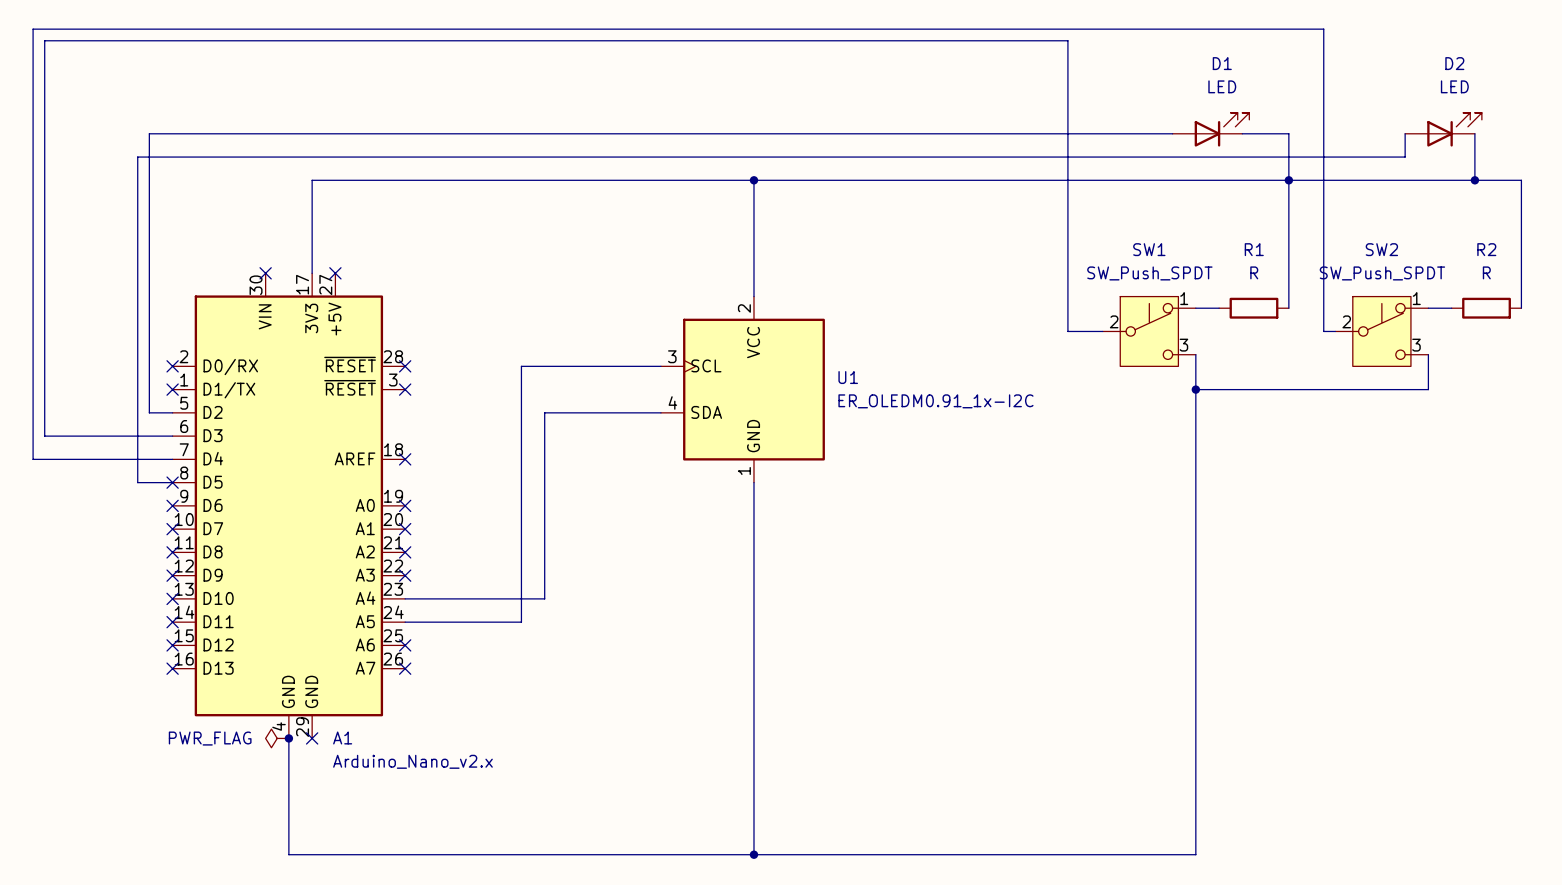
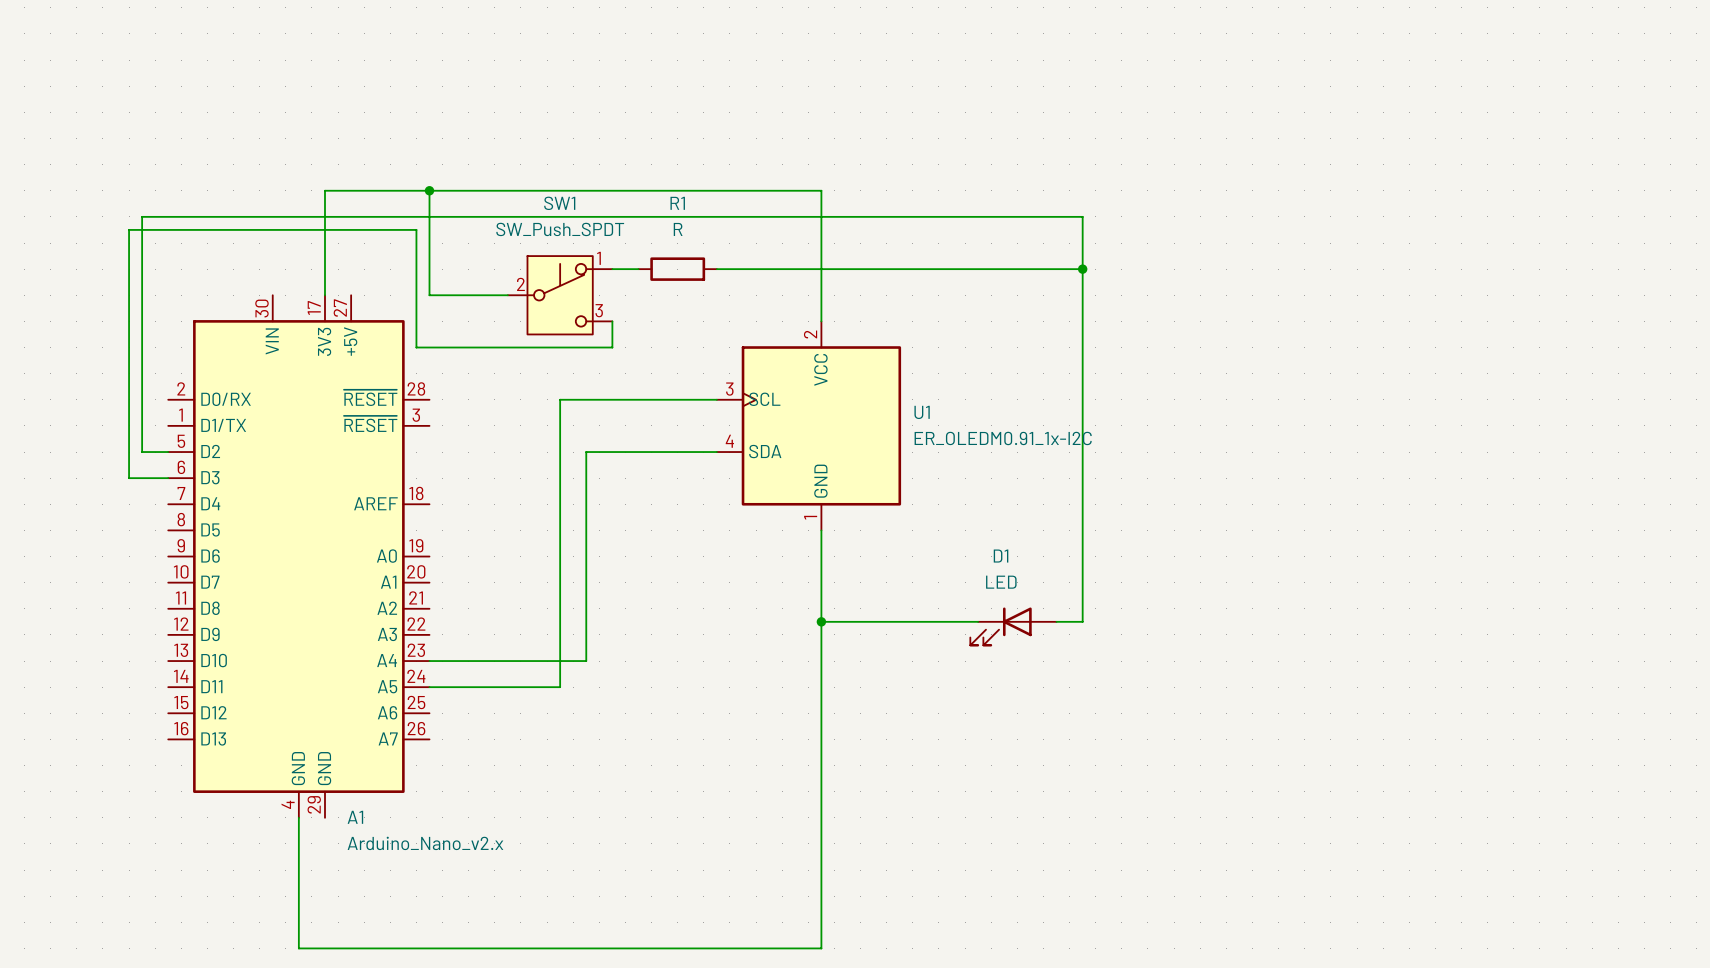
D1 name position: D1 (1222, 63) -> D1 (1001, 556)
D1 value position: LED (1222, 86) -> LED (1001, 582)
D1 position: (1210, 129) -> (1013, 626)
D1 rotation: 0° (1222, 129) -> 180° (1001, 626)
D2: LED (1443, 129) -> none
wire: (1172, 133) (149, 133) (149, 203) -> (1056, 621) (1082, 621) (1082, 216) (142, 216)
wire: (1242, 133) (1288, 133) (1288, 308) -> none
wire: (1405, 133) (1405, 157) (137, 157) (137, 215) -> (612, 321) (612, 347) (416, 347) (416, 229) (129, 229)
wire: (1474, 133) (1474, 180) -> none
wire: none -> (429, 190) (429, 295) (507, 295)
junction: none -> (429, 190)
wire: (753, 180) (1521, 180) (1521, 308) -> none
junction: (753, 180) -> none
junction: (1288, 180) -> none
junction: (1474, 180) -> none
wire: none -> (612, 269) (638, 269)
wire: none -> (716, 269) (1082, 269)
junction: none -> (1082, 269)
no-connect mark: (265, 273) -> none
no-connect mark: (335, 273) -> none
wire: (1195, 308) (1219, 308) -> none
R1 position: (1253, 308) -> (677, 269)
wire: (1428, 308) (1451, 308) -> none
R2: R (1486, 308) -> none
wire: (1102, 331) (1067, 331) (1067, 40) (44, 40) (44, 436) (137, 436) (137, 482) (172, 482) -> none
SW1 position: (1149, 331) -> (560, 295)
wire: (1335, 331) (1323, 331) (1323, 29) (33, 29) (33, 459) (172, 459) -> none
SW2: SW_Push_SPDT (1381, 331) -> none
wire: (1195, 354) (1195, 854) (753, 854) -> none
wire: (1428, 354) (1428, 389) (1195, 389) -> none
no-connect mark: (172, 366) -> none
no-connect mark: (405, 366) -> none
no-connect mark: (172, 389) -> none
no-connect mark: (405, 389) -> none
junction: (1195, 389) -> none
no-connect mark: (405, 459) -> none
no-connect mark: (172, 482) -> none
no-connect mark: (172, 505) -> none
no-connect mark: (405, 505) -> none
no-connect mark: (172, 529) -> none
no-connect mark: (405, 529) -> none
no-connect mark: (172, 552) -> none
no-connect mark: (405, 552) -> none
wire: none -> (821, 621) (978, 621)
junction: none -> (821, 621)
no-connect mark: (172, 575) -> none
no-connect mark: (405, 575) -> none
no-connect mark: (172, 598) -> none
no-connect mark: (172, 622) -> none
no-connect mark: (172, 645) -> none
no-connect mark: (405, 645) -> none
no-connect mark: (172, 668) -> none
no-connect mark: (405, 668) -> none
power symbol: PWR_FLAG (277, 738) -> none
junction: (288, 738) -> none
no-connect mark: (312, 738) -> none
junction: (753, 854) -> none

